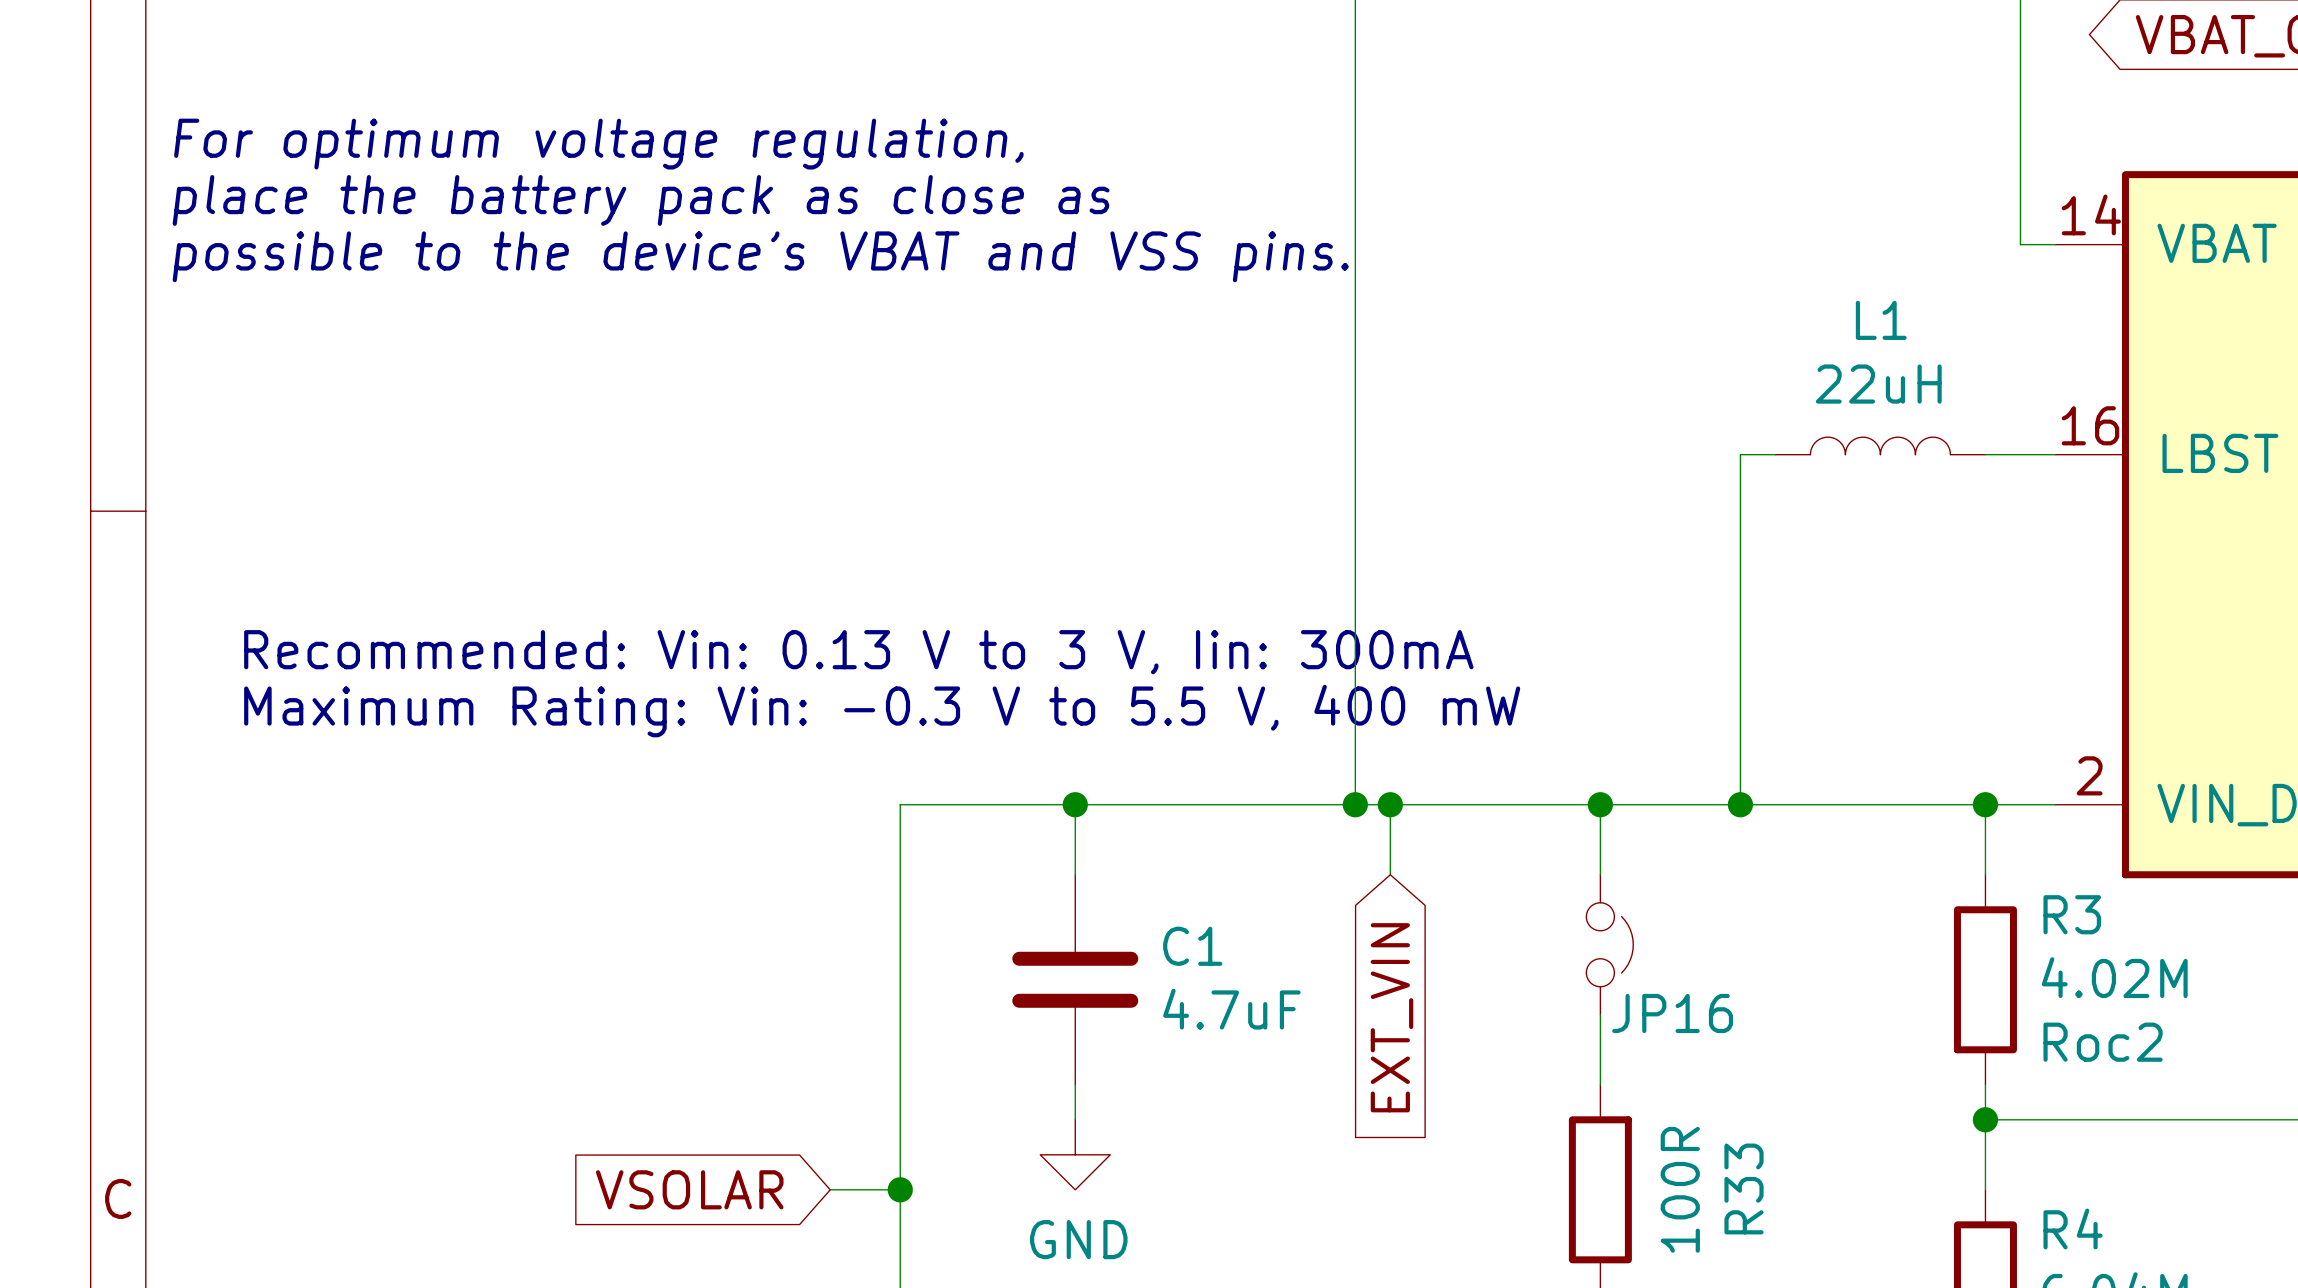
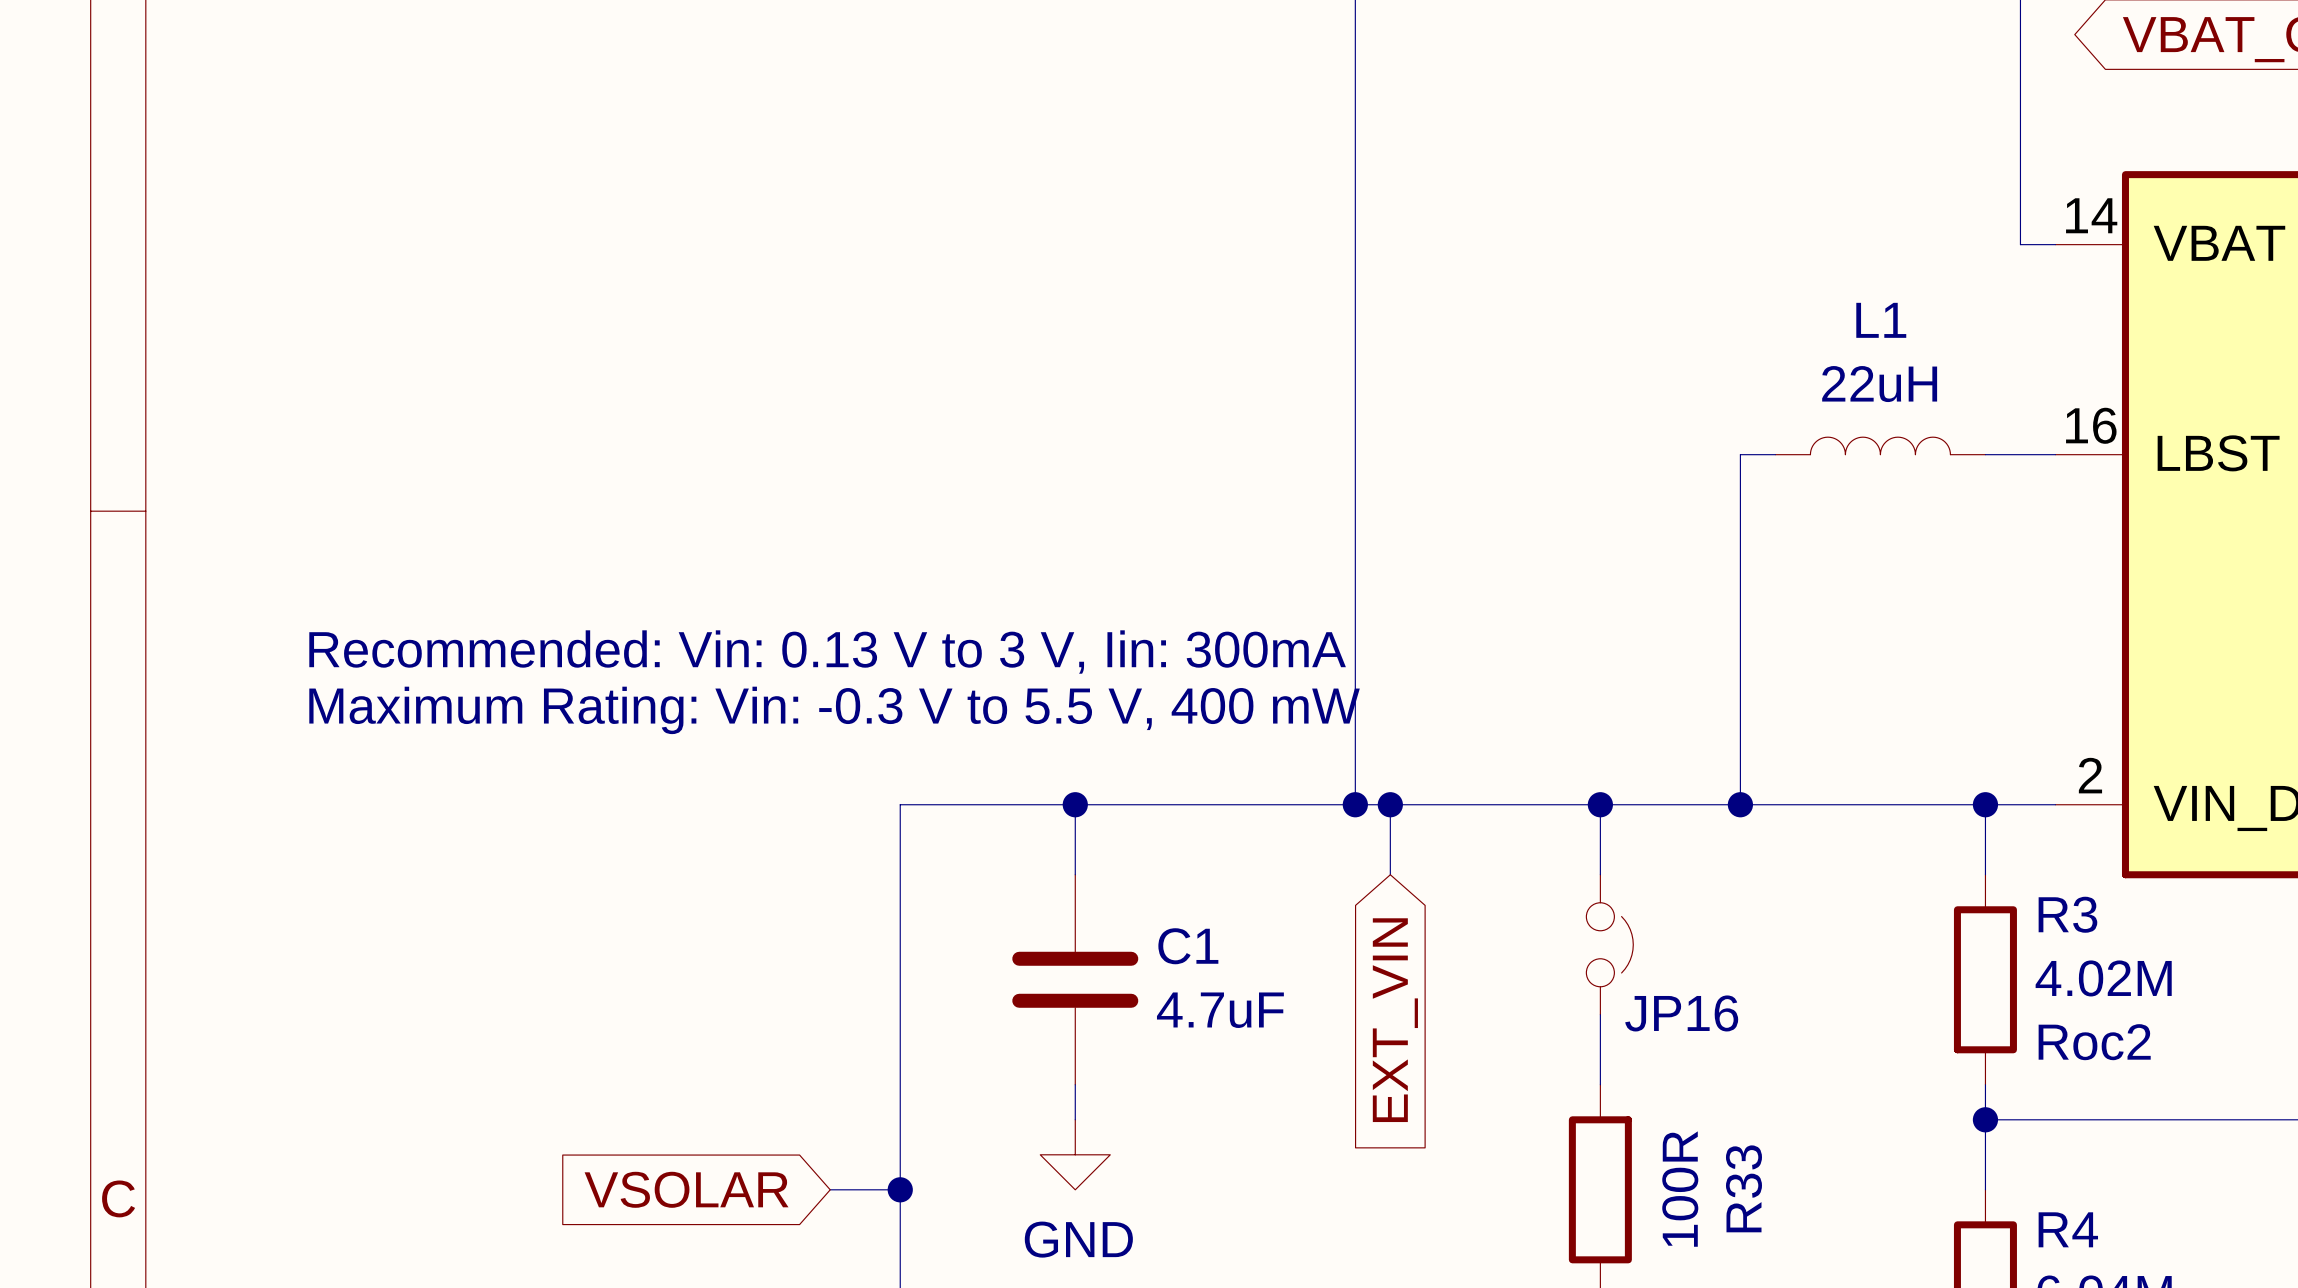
text: For optimum voltage regulation, (598, 144) -> none
text: place the battery pack as close as (641, 200) -> none
text: possible to the device’s VBAT and VSS pins. (760, 256) -> none
text position: Recommended: Vin: 0.13 V to 3 V, Iin: 300mA (858, 652) -> Recommended: Vin: 0.13 V to 3 V, Iin: 300mA (827, 652)
text position: Maximum Rating: Vin: -0.3 V to 5.5 V, 400 mW (882, 711) -> Maximum Rating: Vin: -0.3 V to 5.5 V, 400 mW (834, 710)

